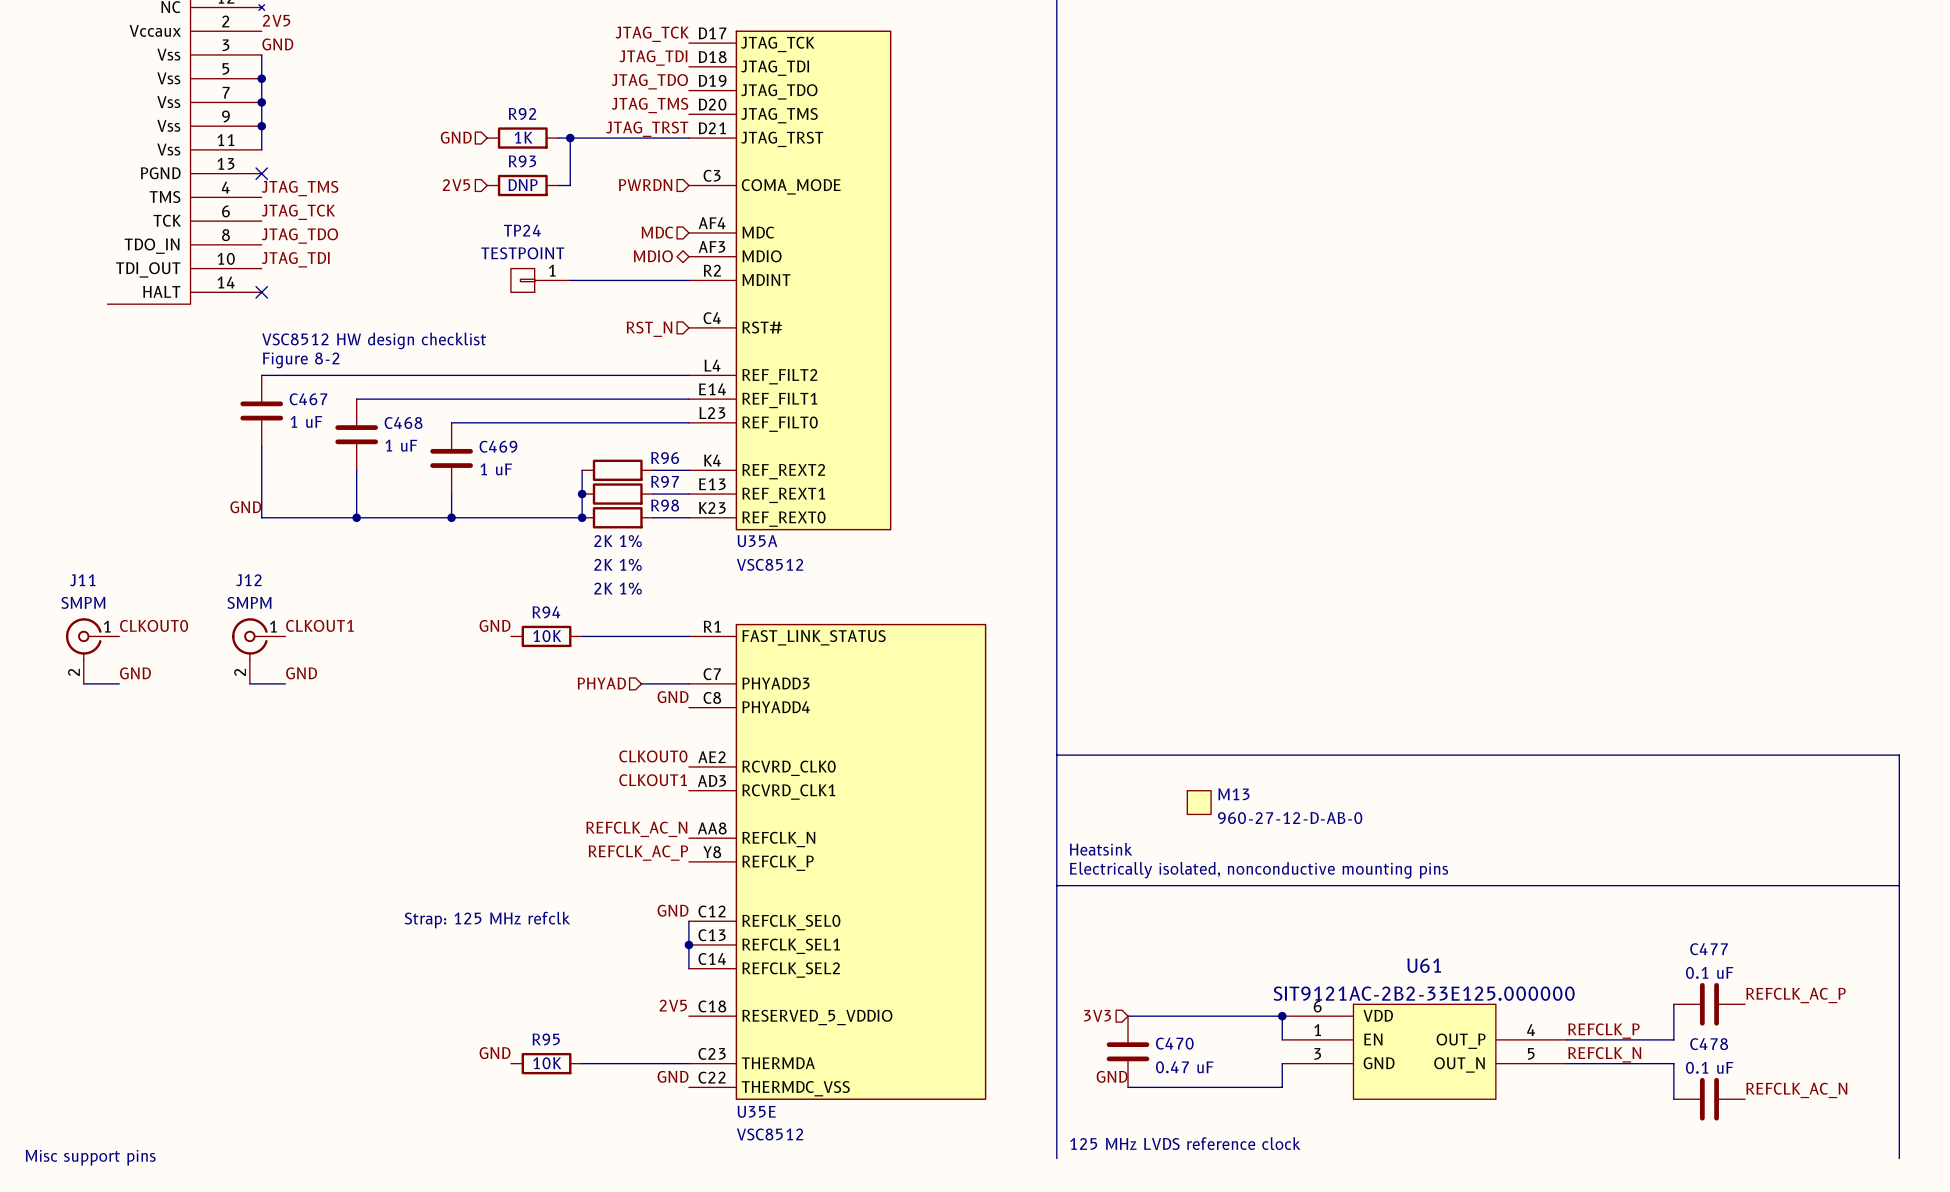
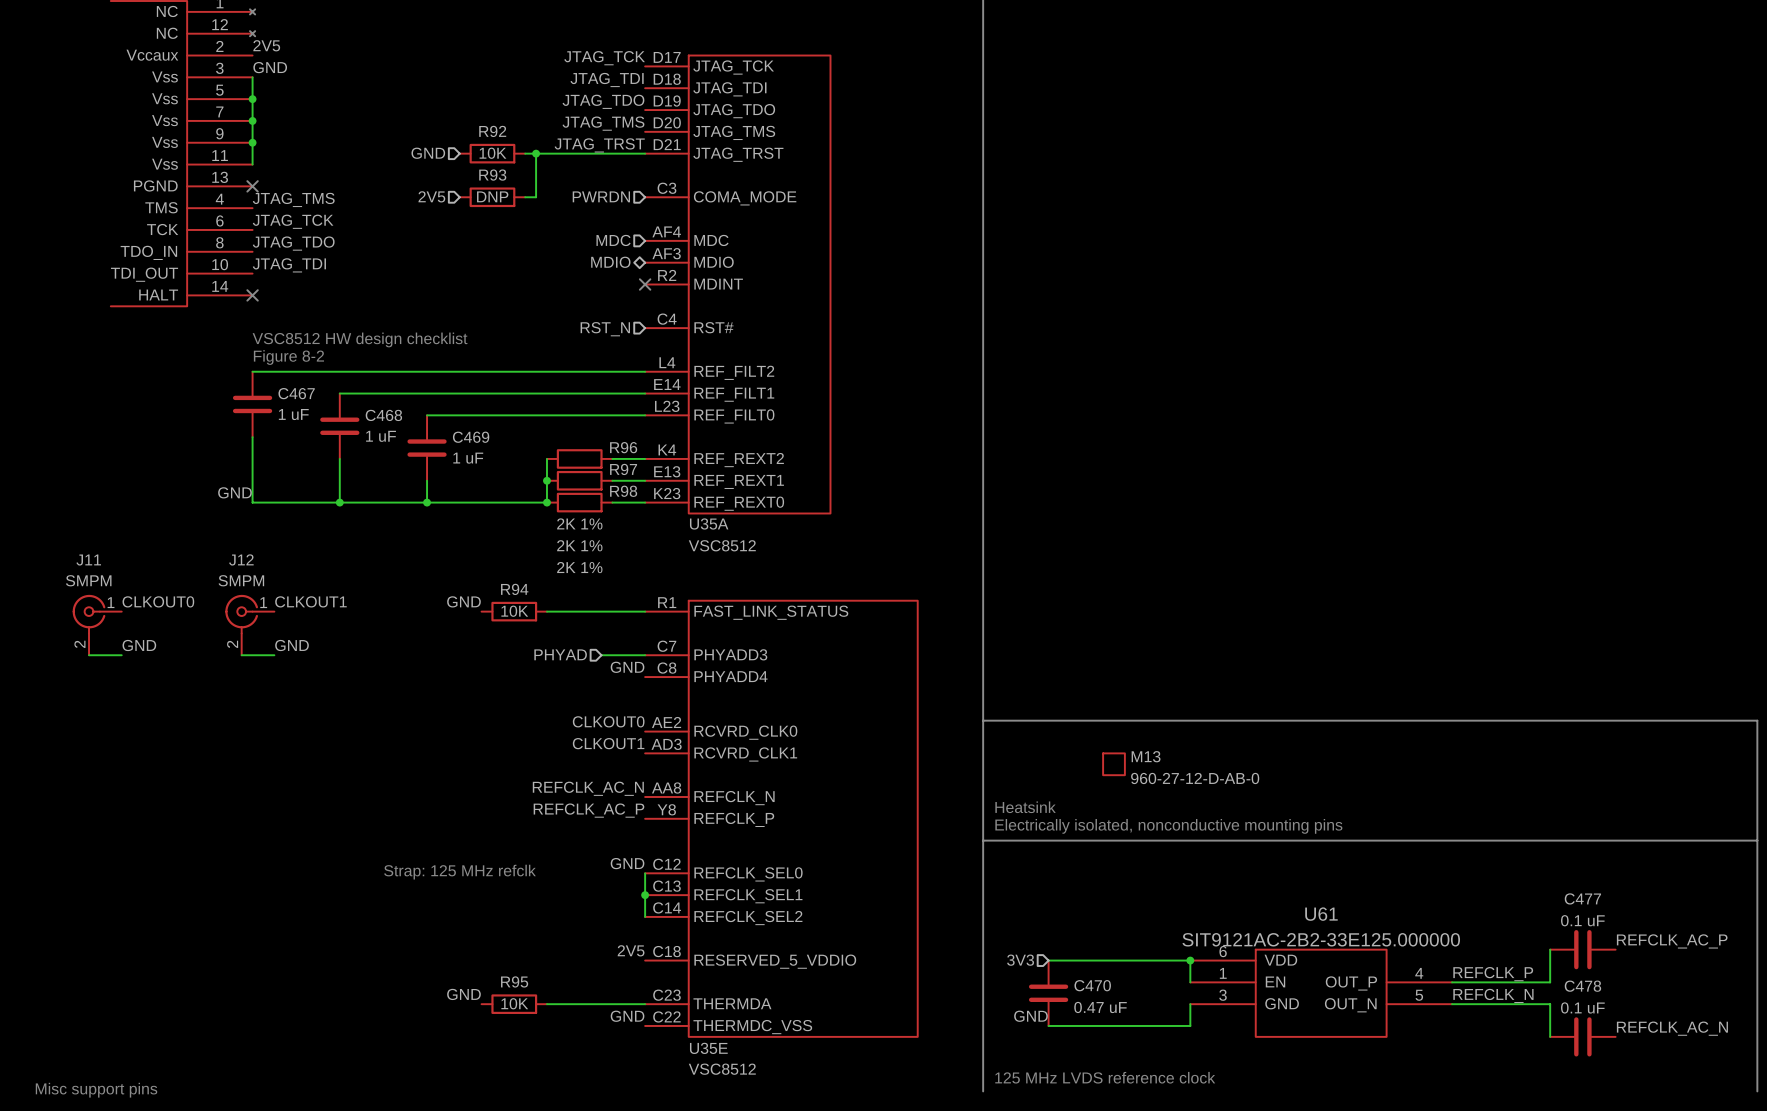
R92 value: 1K (523, 137) -> 10K (492, 153)
TP24: TESTPOINT (540, 280) -> none
wire: (570, 280) (688, 280) -> none
no-connect mark: none -> (645, 284)

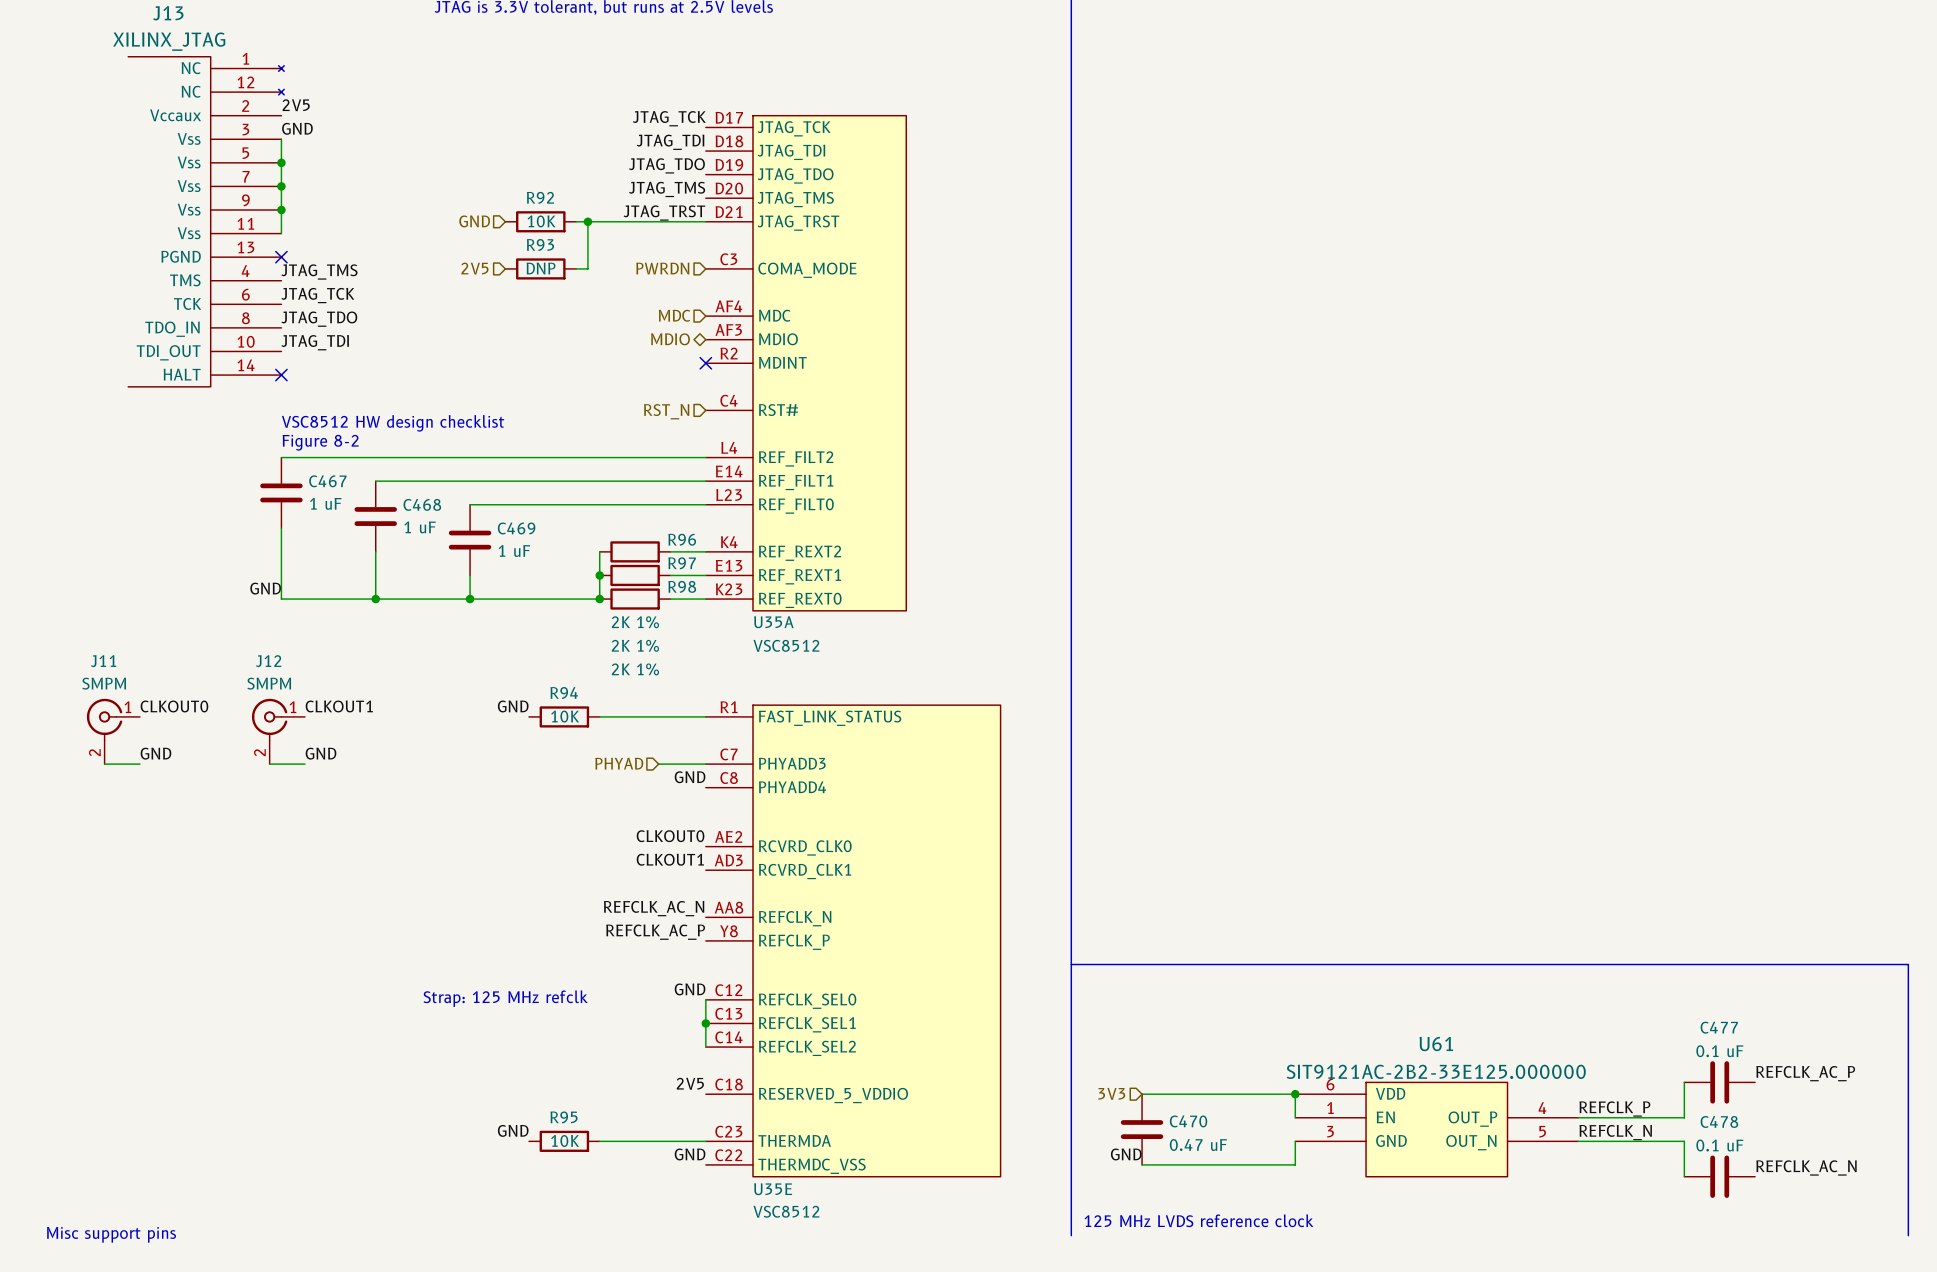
line: (983, 720) (1757, 720) (1757, 840) -> none
M13: 960-27-12-D-AB-0 (1114, 764) -> none
text: Heatsink (1025, 807) -> none
text: Electrically isolated, nonconductive mounting pins (1168, 826) -> none

